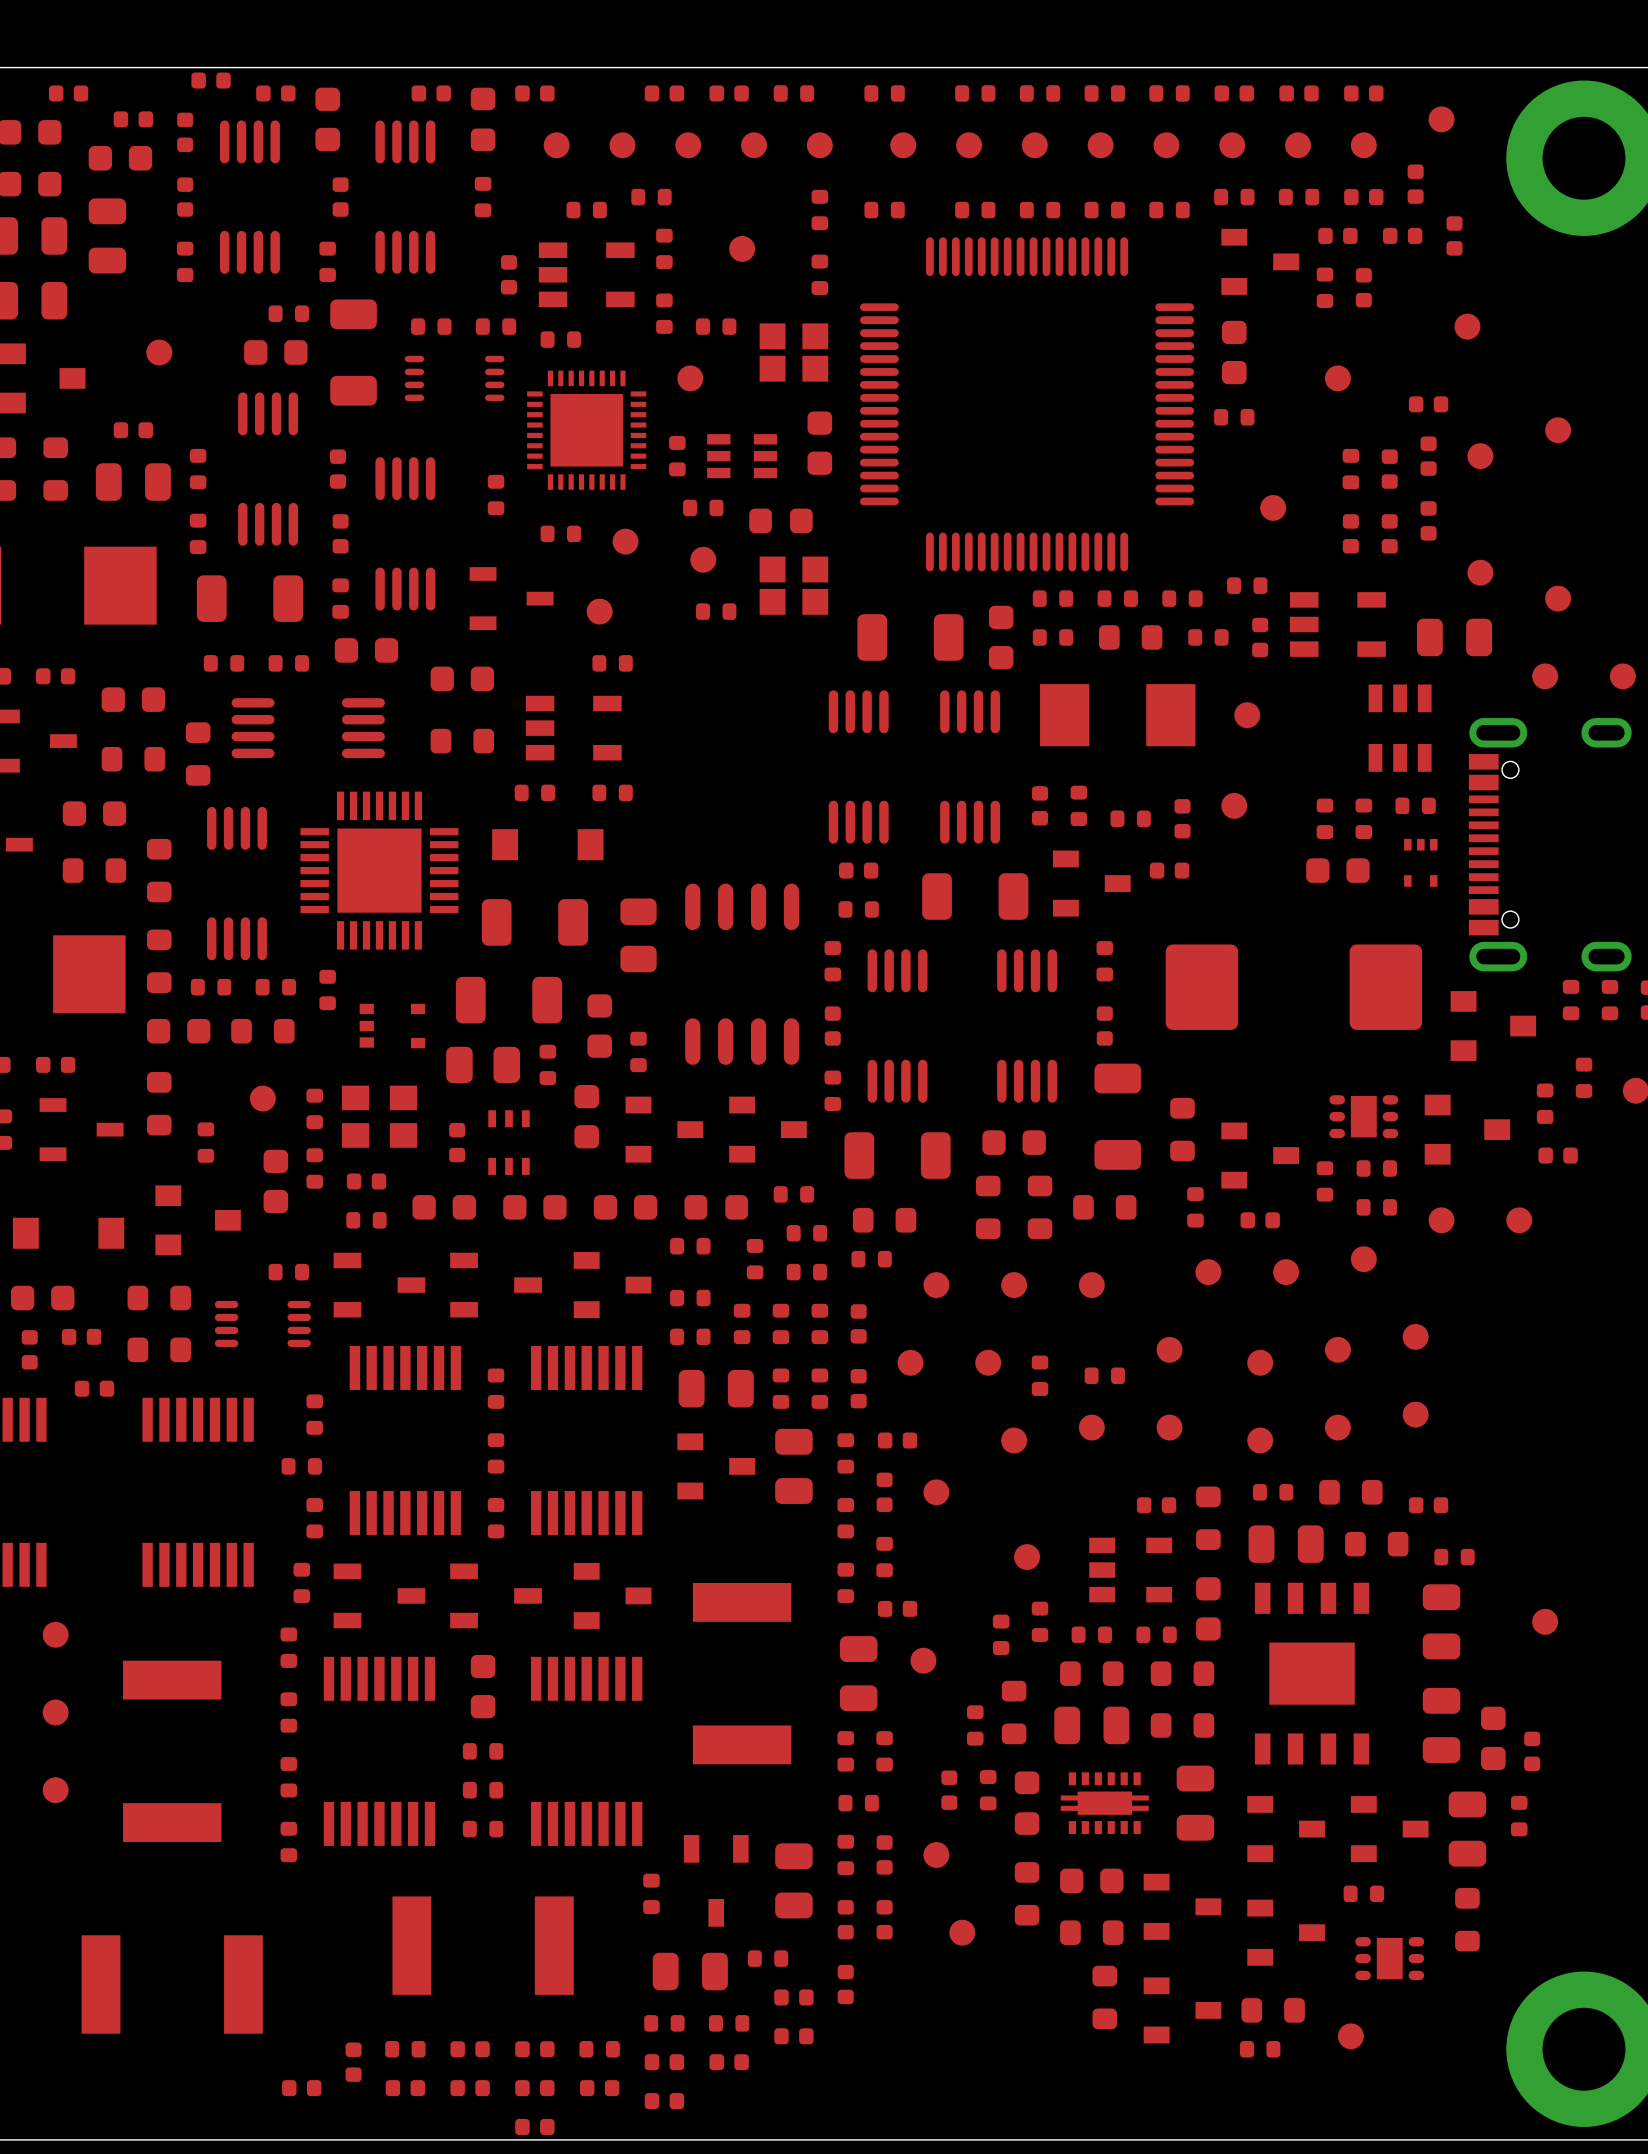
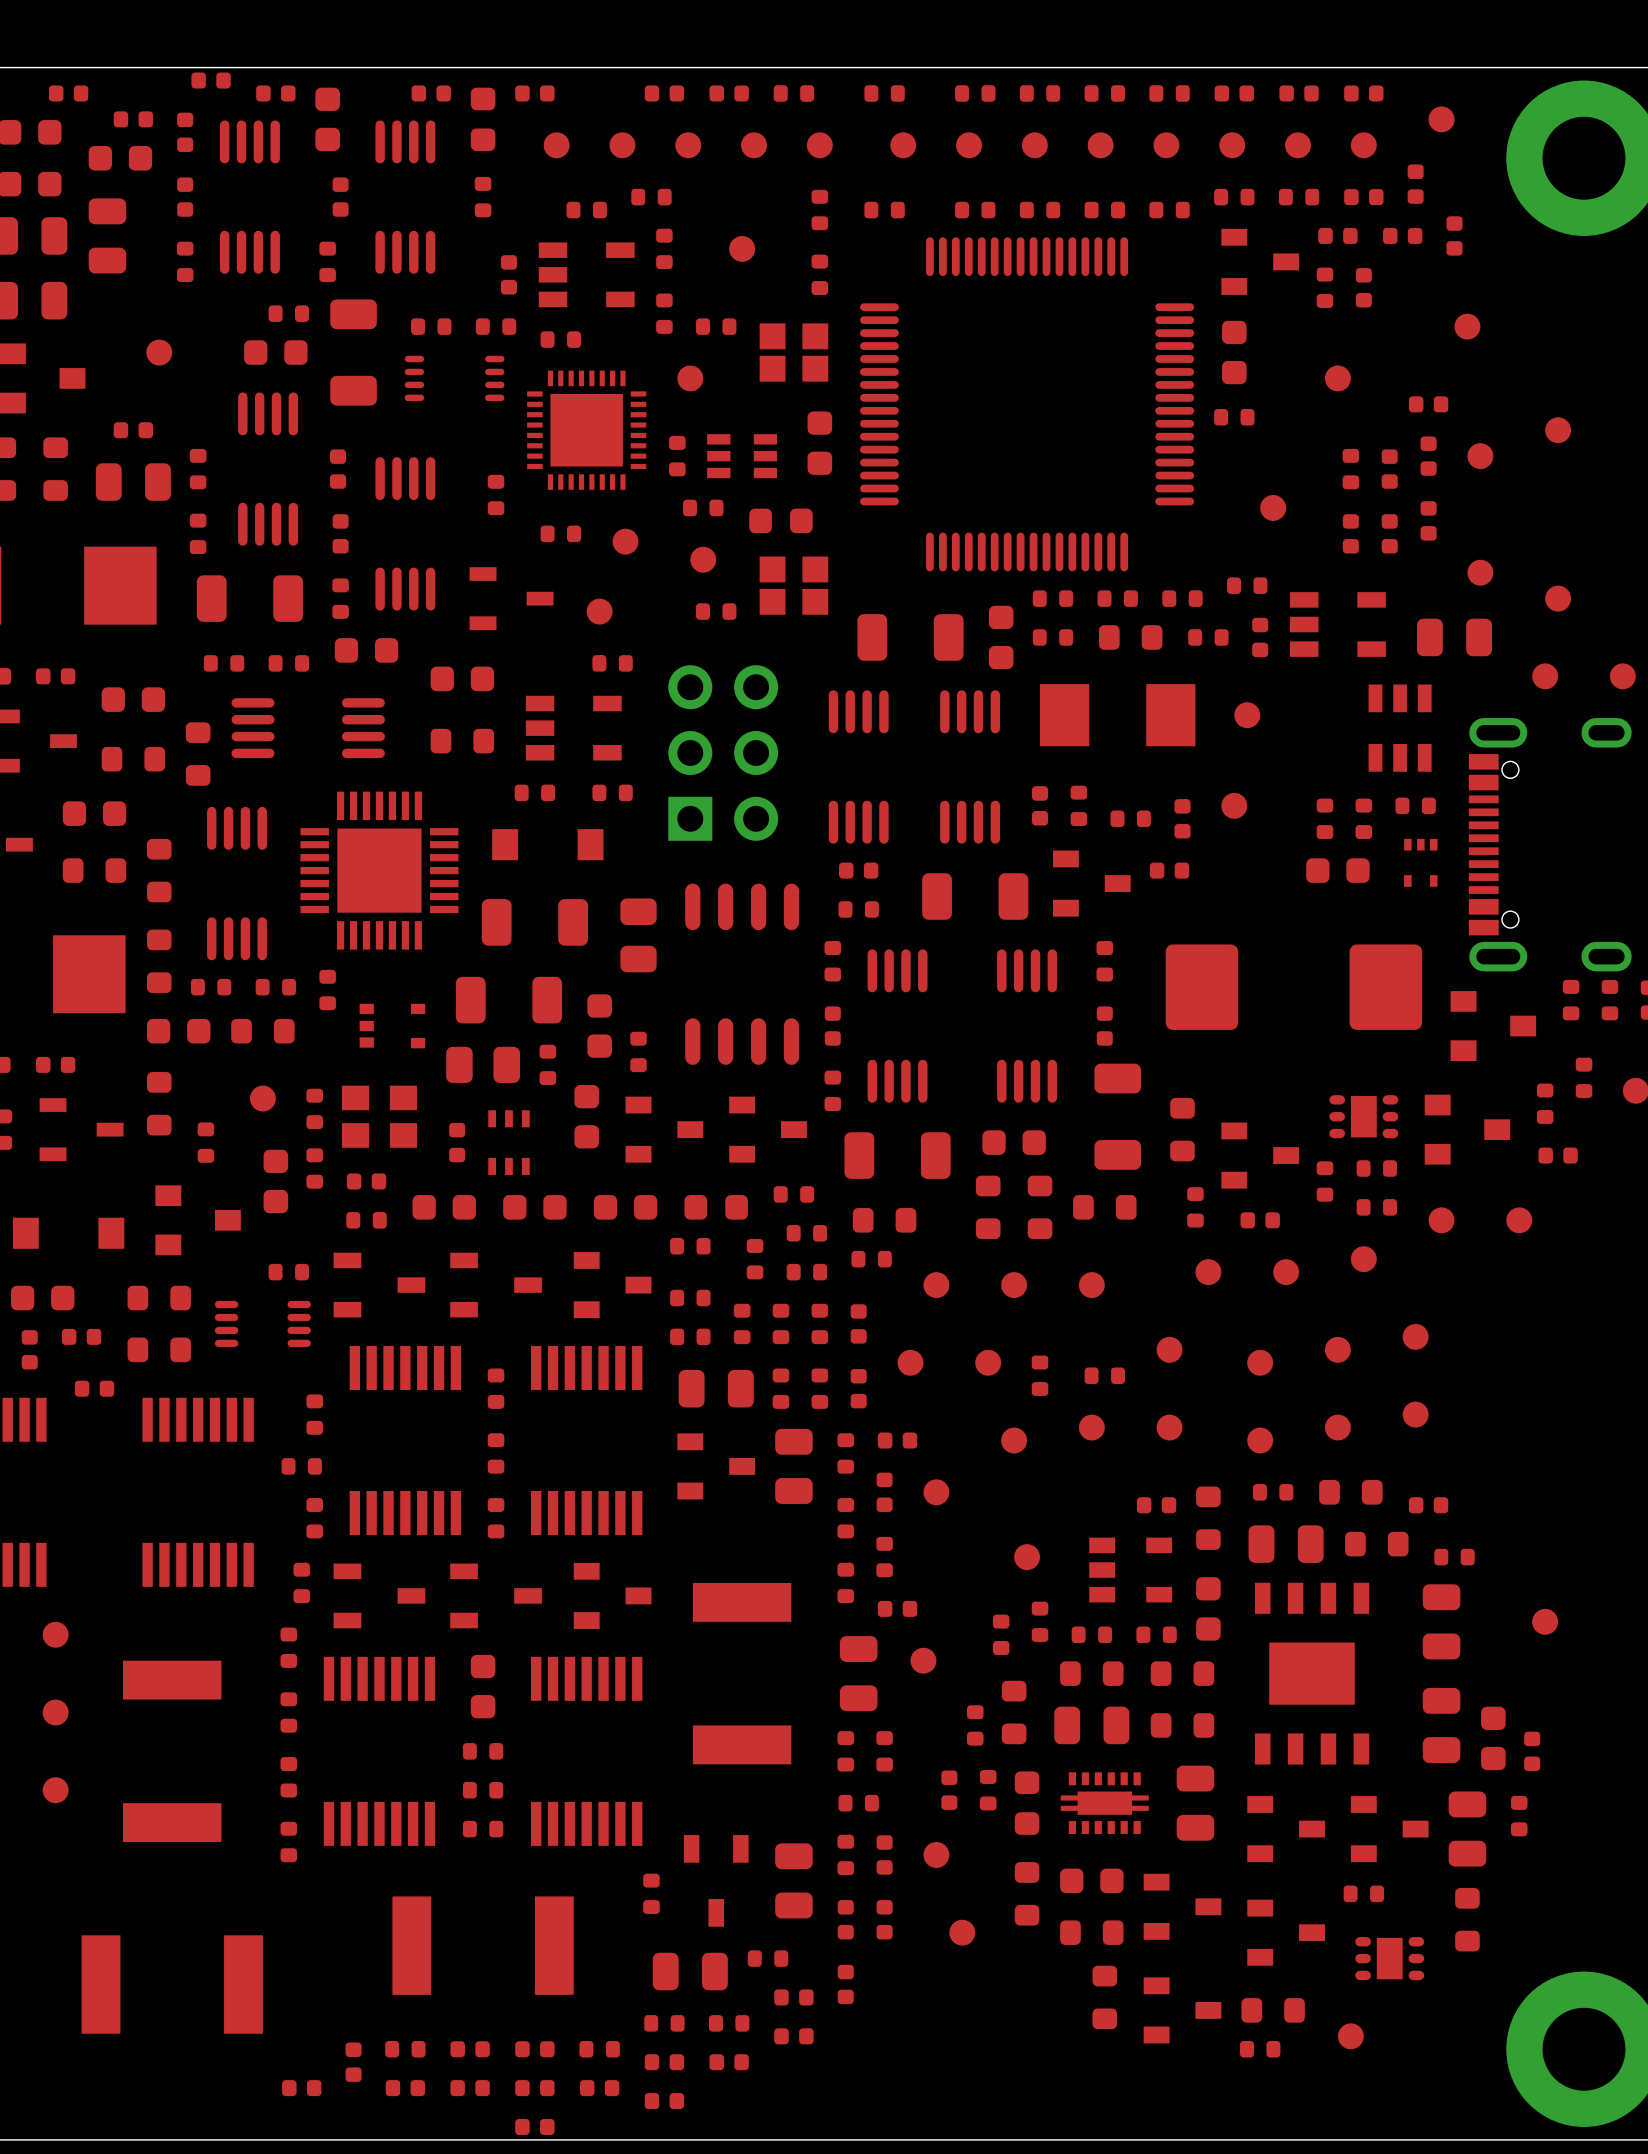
part: none -> (723, 753)

